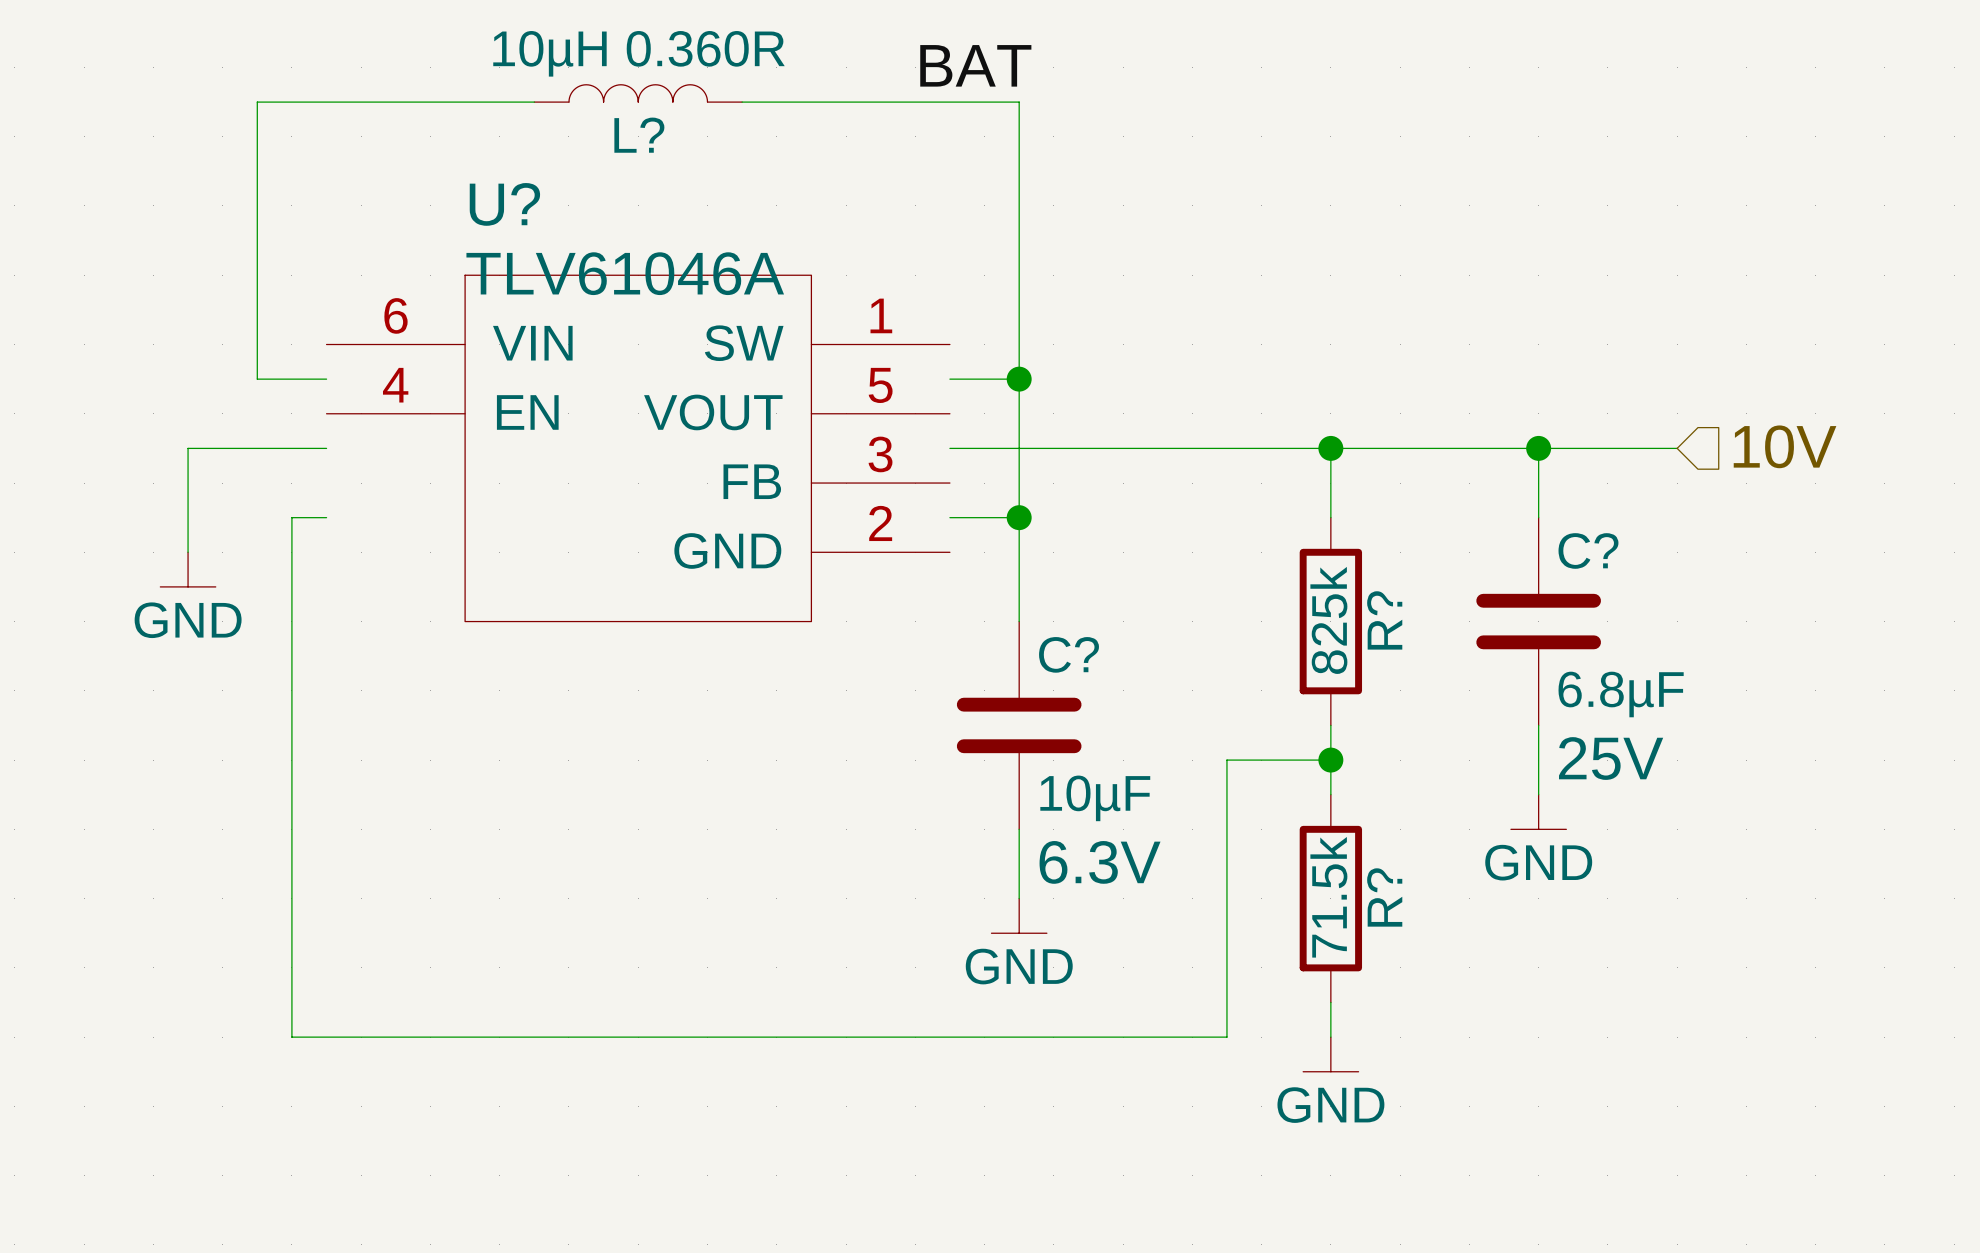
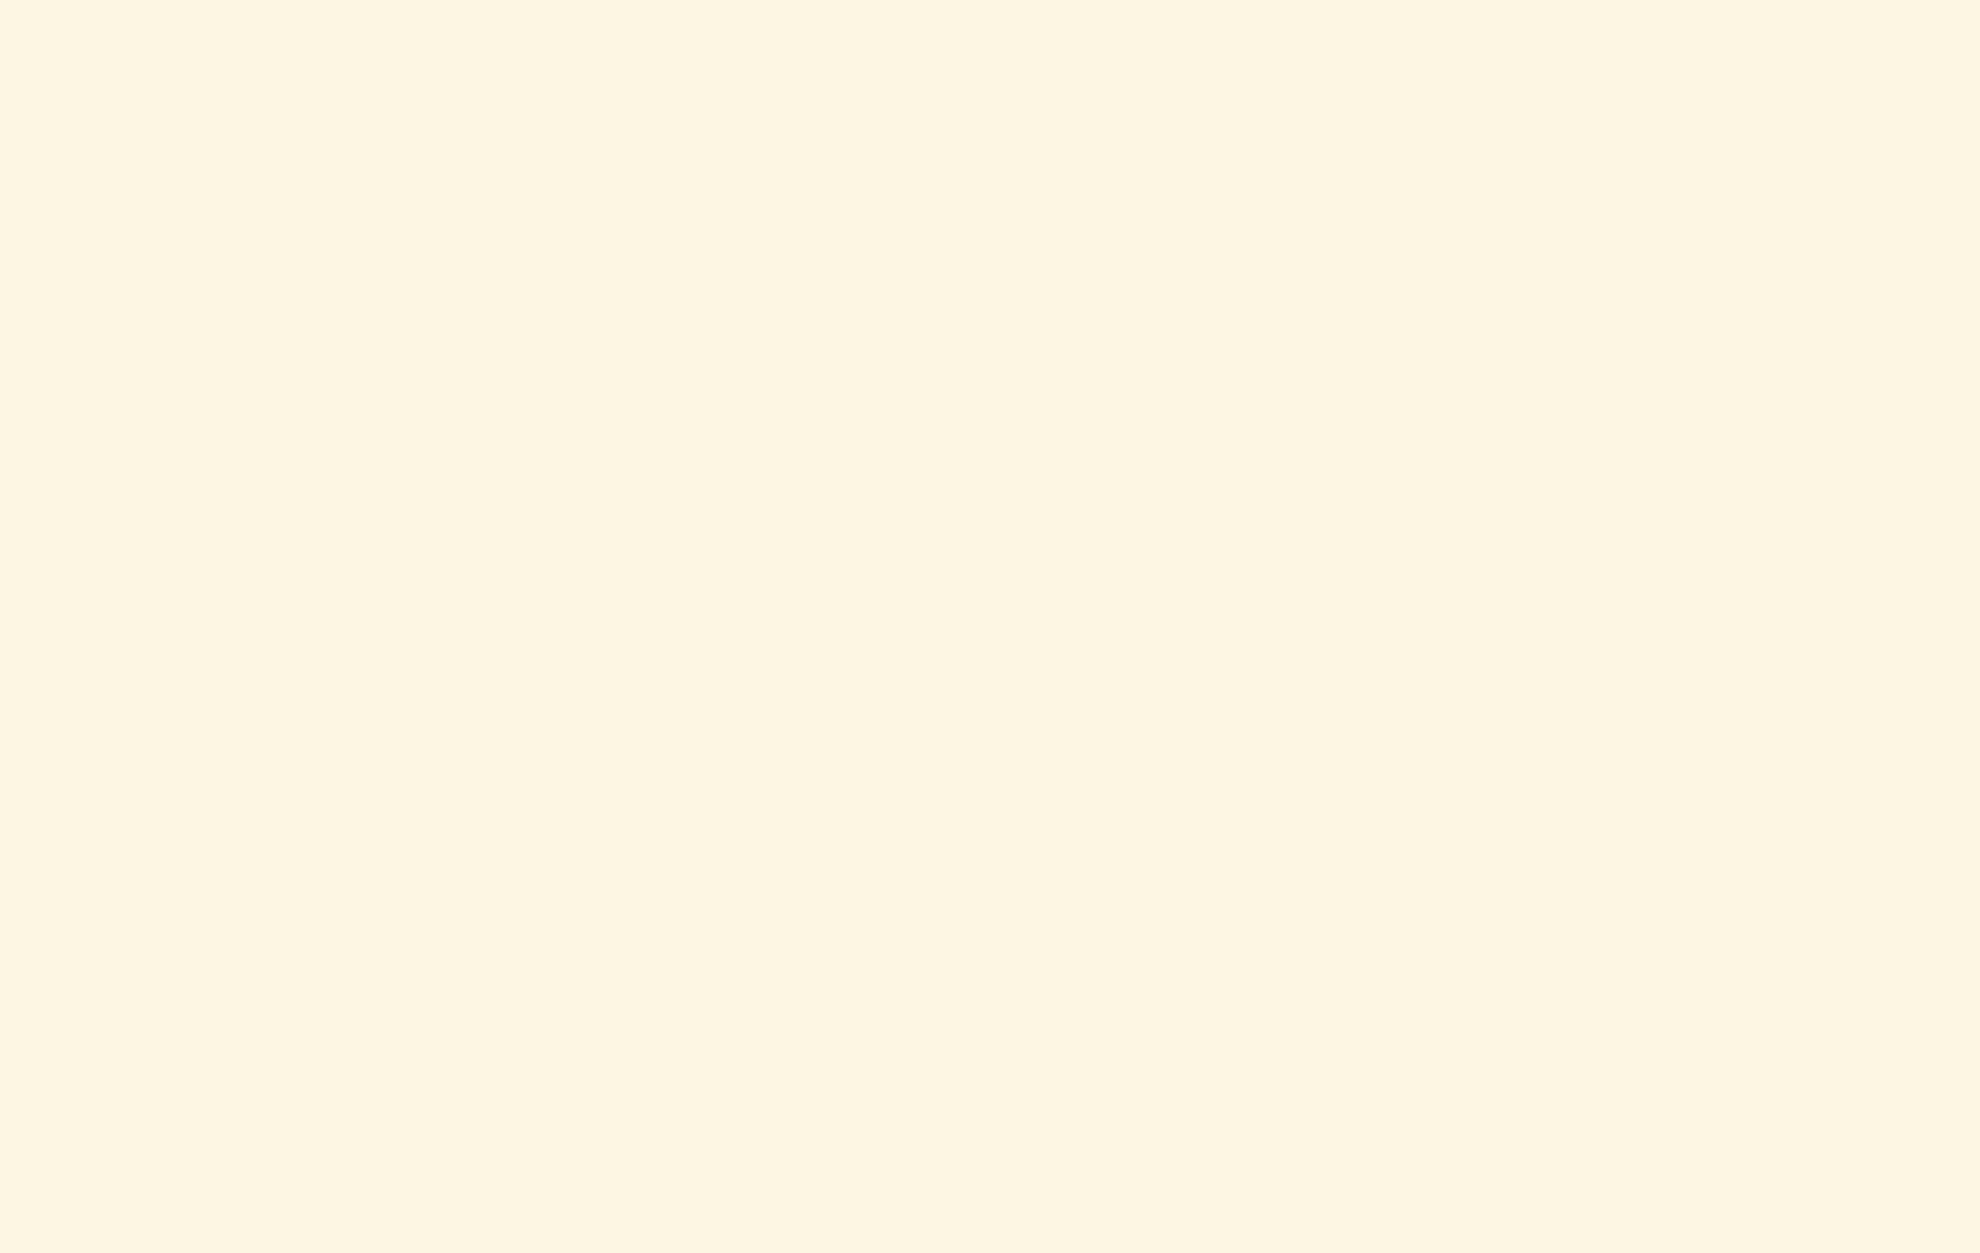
label: BAT (975, 65) -> none
L?: 10µH 0.360R (638, 93) -> none
wire: (534, 102) (257, 102) (257, 379) (326, 379) -> none
wire: (742, 102) (1019, 102) (1019, 621) -> none
wire: (949, 379) (1019, 379) -> none
junction: (1019, 379) -> none
hierarchical label: 10V (1785, 446) -> none
wire: (326, 448) (188, 448) (188, 552) -> none
U?: TLV61046A (638, 448) -> none
wire: (949, 448) (1677, 448) -> none
wire: (1330, 448) (1330, 517) -> none
junction: (1330, 448) -> none
wire: (1538, 448) (1538, 517) -> none
junction: (1538, 448) -> none
wire: (326, 517) (291, 517) (291, 1037) (1226, 1037) (1226, 760) (1330, 760) -> none
wire: (949, 517) (1019, 517) -> none
junction: (1019, 517) -> none
power symbol: GND (188, 569) -> none
R?: 825k (1330, 621) -> none
C?: 6.8µF (1538, 621) -> none
C?: 10µF (1019, 725) -> none
wire: (1330, 725) (1330, 794) -> none
wire: (1538, 725) (1538, 794) -> none
junction: (1330, 760) -> none
power symbol: GND (1538, 812) -> none
wire: (1019, 829) (1019, 898) -> none
R?: 71.5k (1330, 898) -> none
power symbol: GND (1019, 915) -> none
wire: (1330, 1002) (1330, 1037) -> none
power symbol: GND (1330, 1054) -> none

